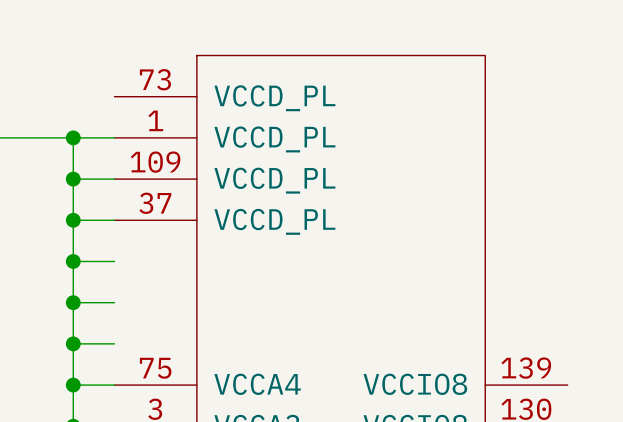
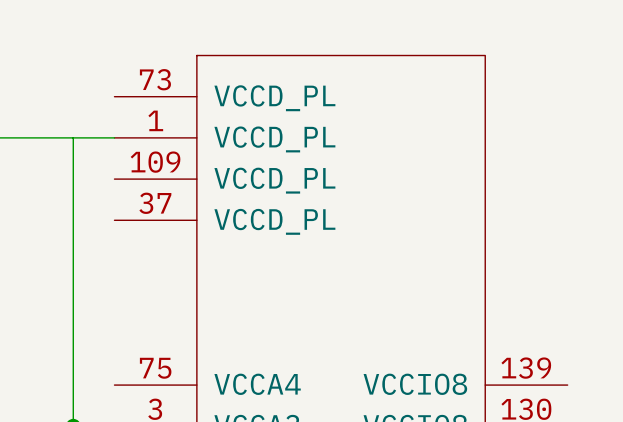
junction: (73, 137) -> none
wire: (73, 179) (114, 179) -> none
junction: (73, 179) -> none
wire: (73, 220) (114, 220) -> none
junction: (73, 220) -> none
wire: (73, 261) (114, 261) -> none
junction: (73, 261) -> none
wire: (73, 302) (114, 302) -> none
junction: (73, 302) -> none
wire: (73, 343) (114, 343) -> none
junction: (73, 343) -> none
wire: (73, 385) (114, 385) -> none
junction: (73, 385) -> none

